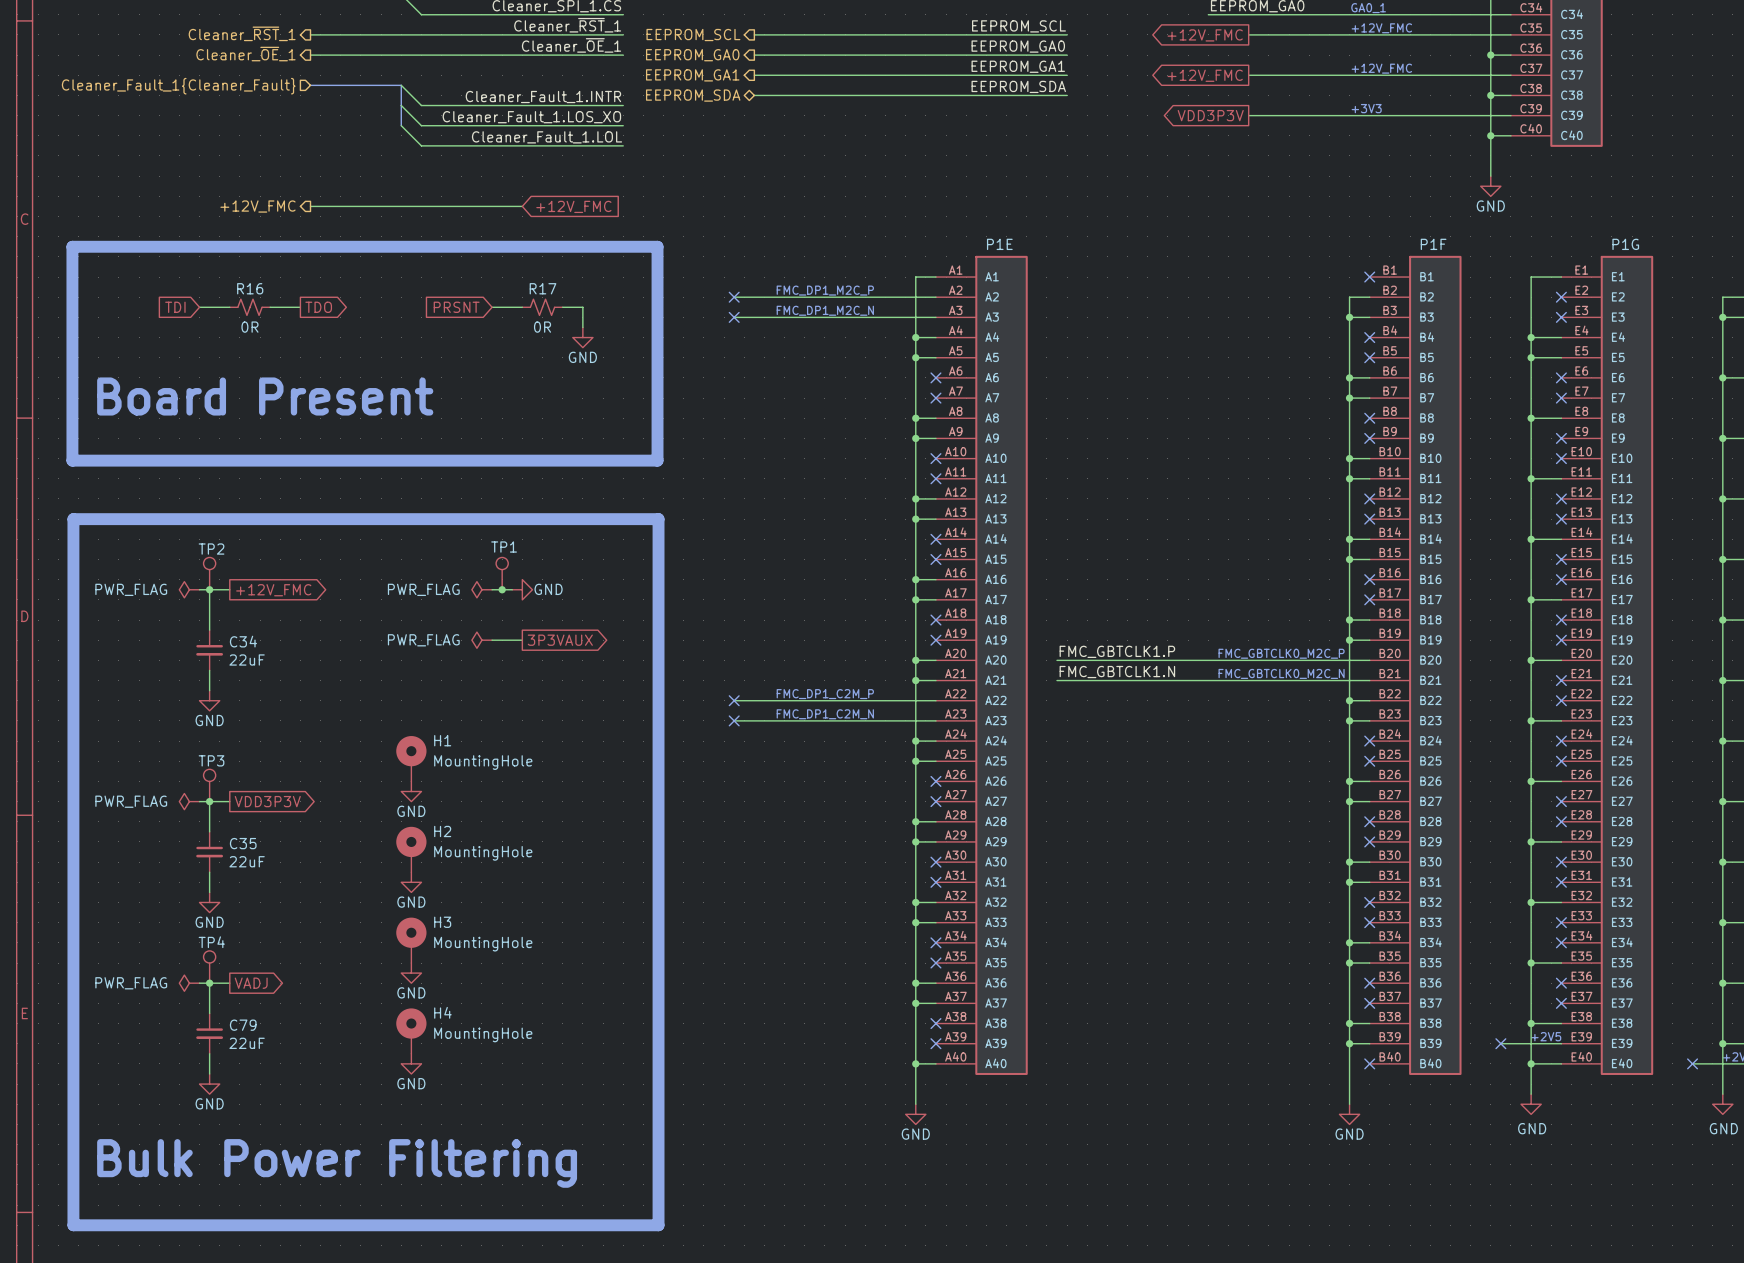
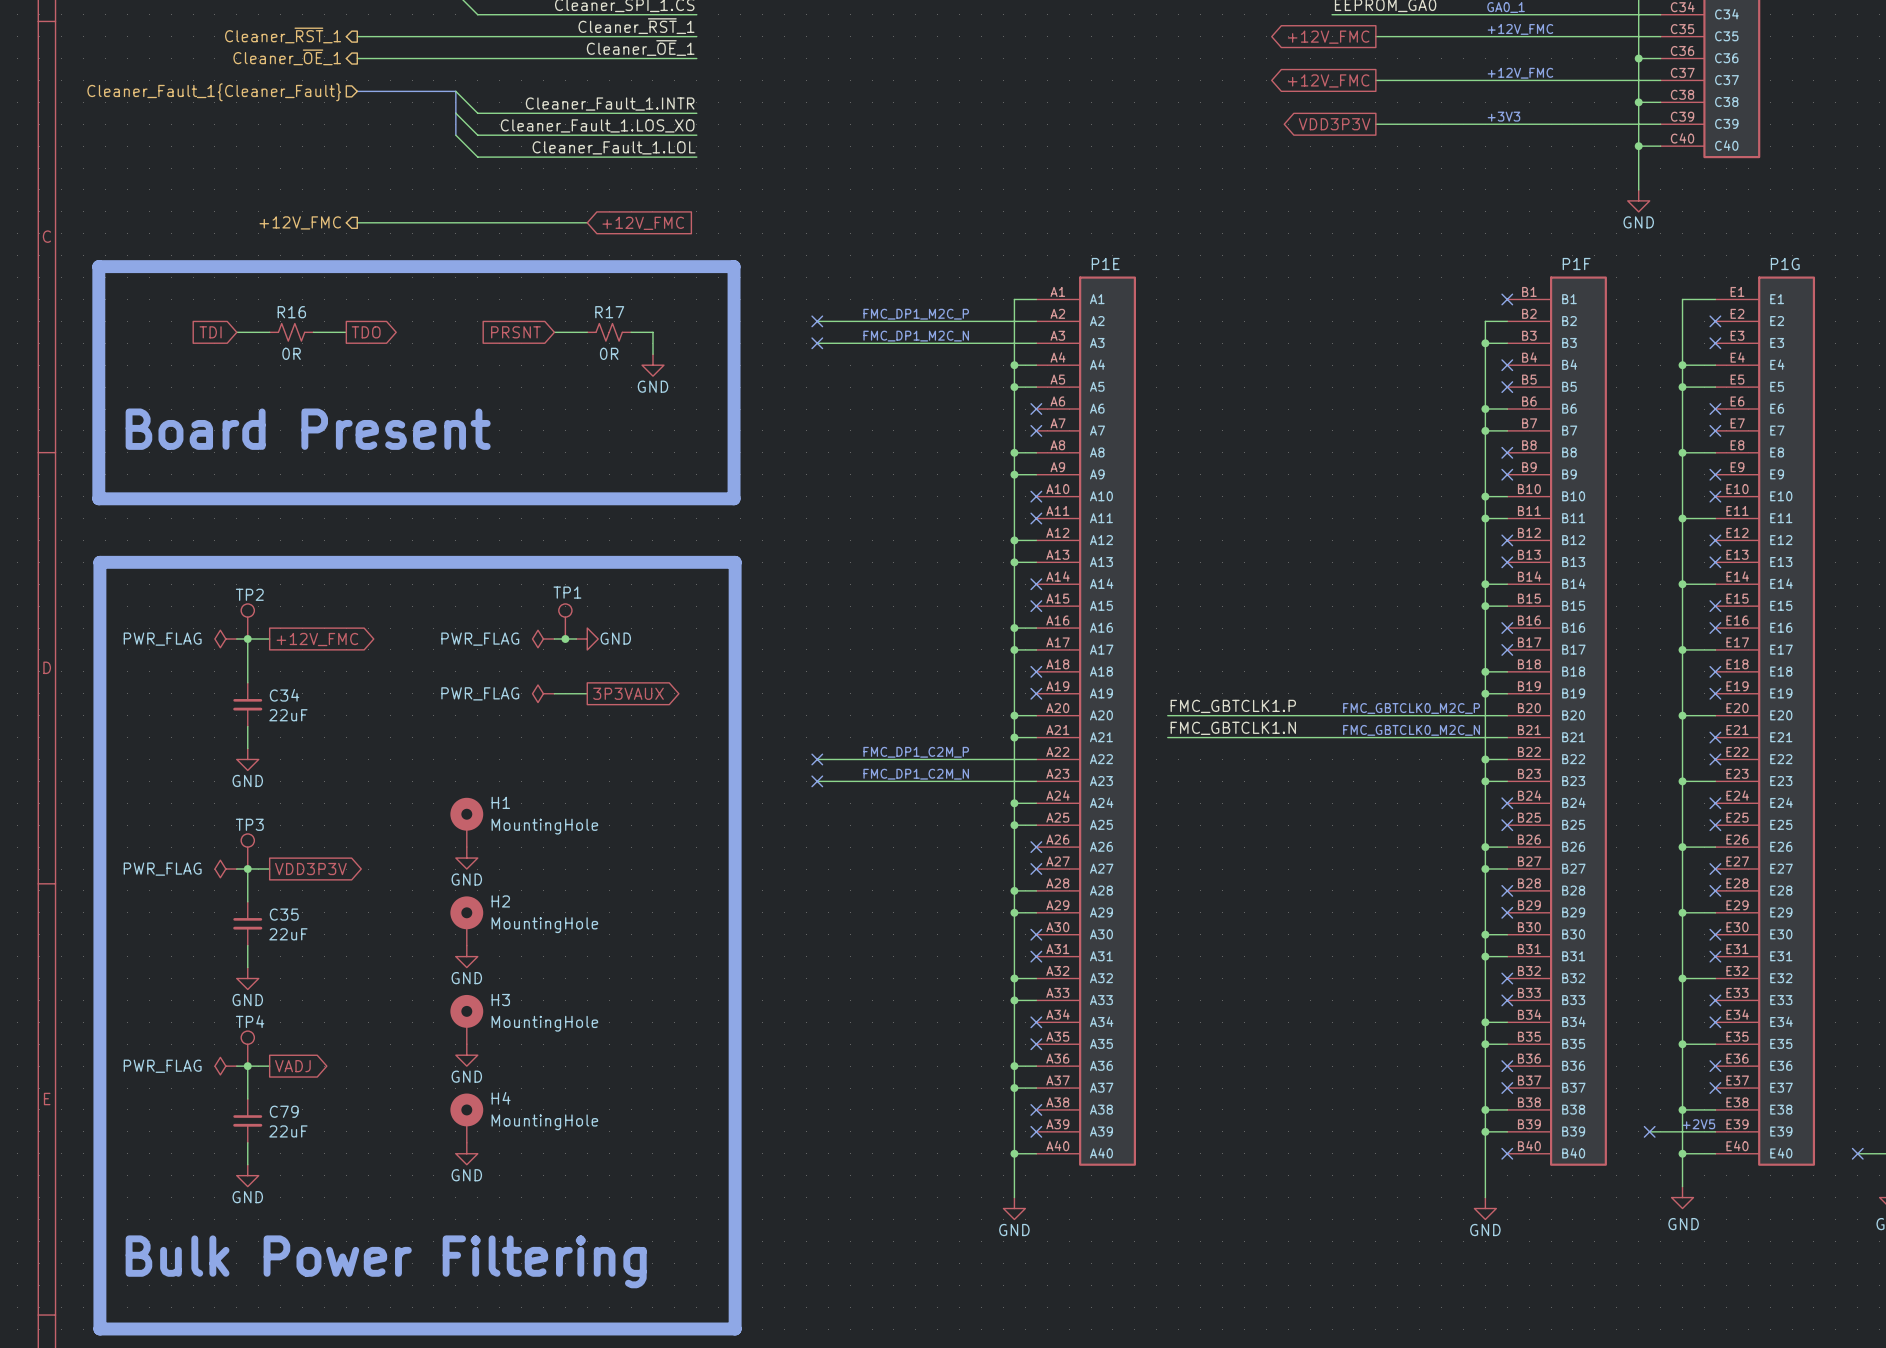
label: EEPROM_SCL (1018, 26) -> none
wire: (754, 34) (1067, 34) -> none
hierarchical label: EEPROM_SCL (693, 35) -> none
label: EEPROM_GA0 (1018, 46) -> none
hierarchical label: EEPROM_GA0 (692, 55) -> none
wire: (754, 55) (1067, 55) -> none
label: EEPROM_GA1 (1018, 66) -> none
hierarchical label: EEPROM_GA1 (692, 75) -> none
wire: (754, 75) (1067, 75) -> none
label: EEPROM_SDA (1018, 86) -> none
hierarchical label: EEPROM_SDA (693, 95) -> none
wire: (754, 95) (1067, 95) -> none

